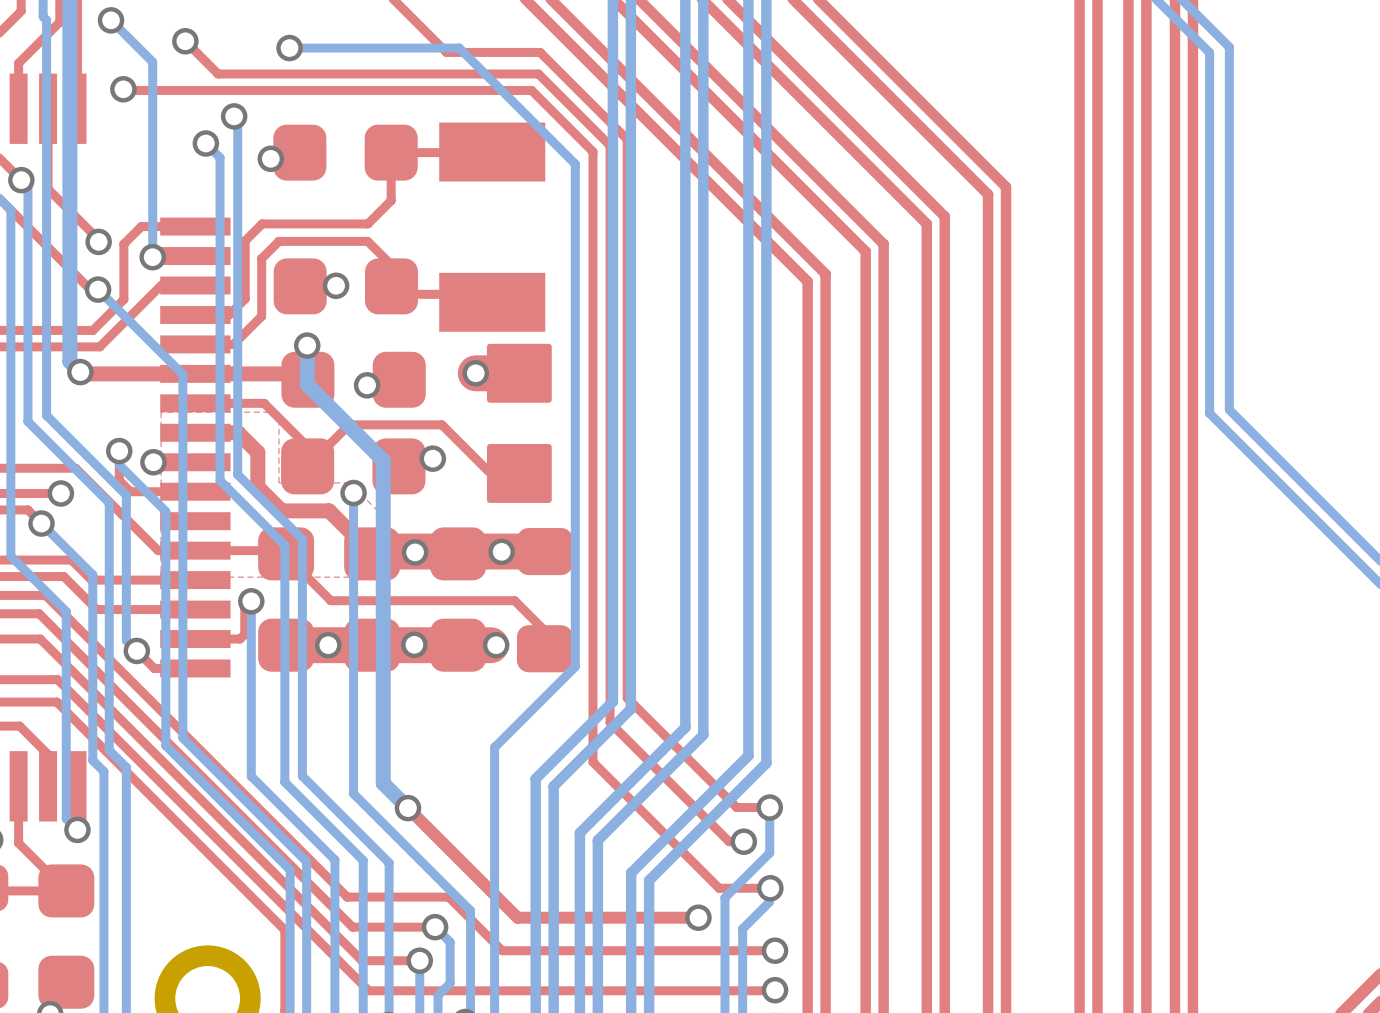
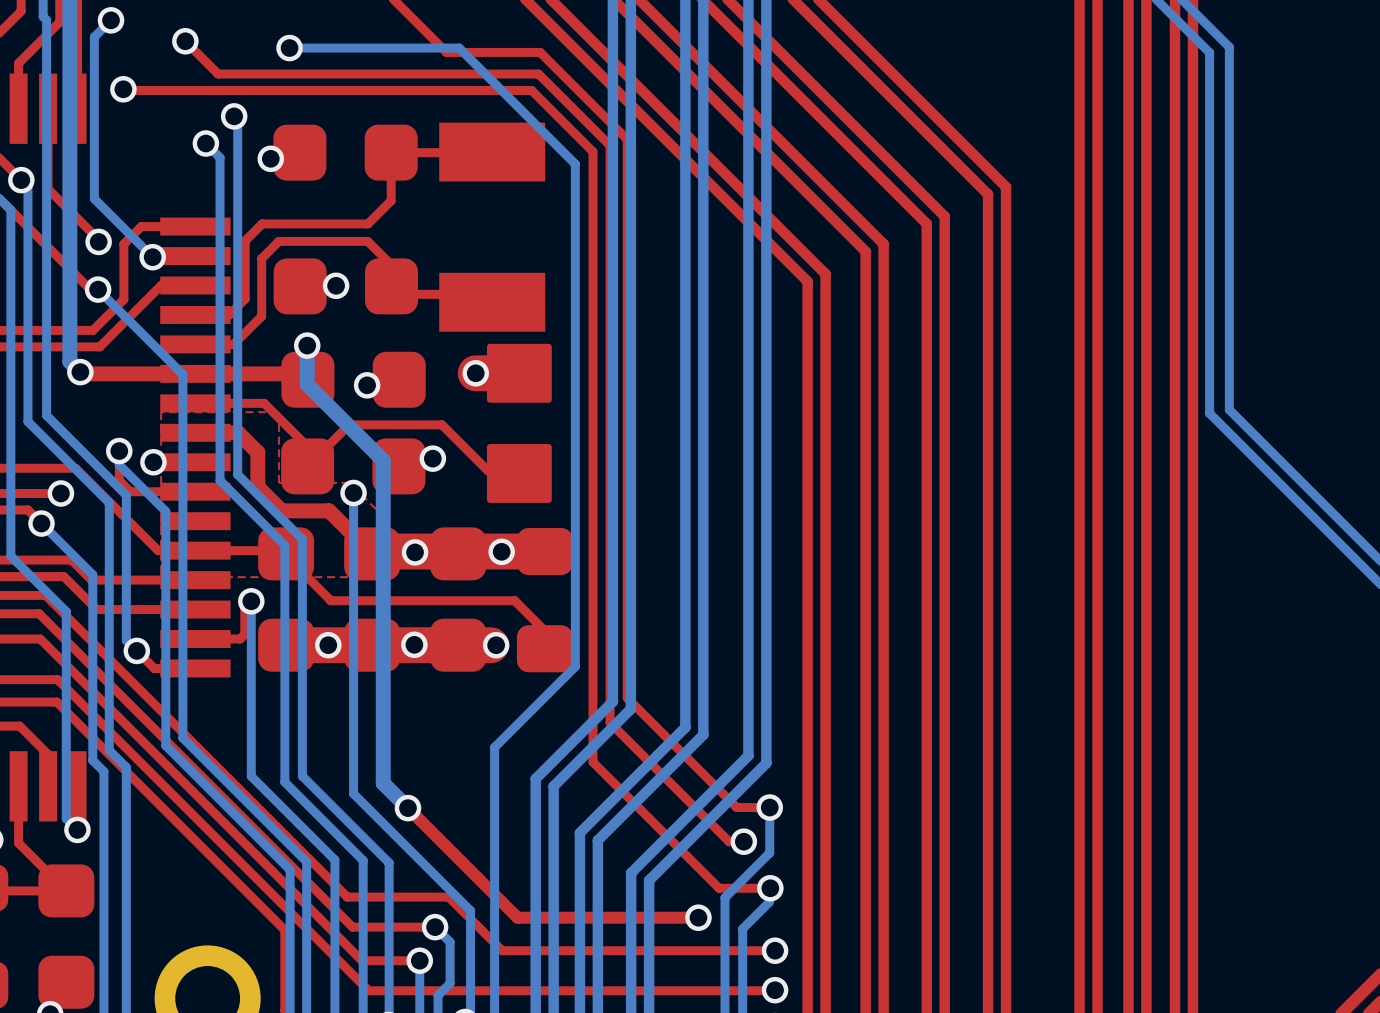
bottom track: (111, 20) (152, 62) (152, 257) -> (111, 20) (94, 37) (94, 198) (152, 257)

